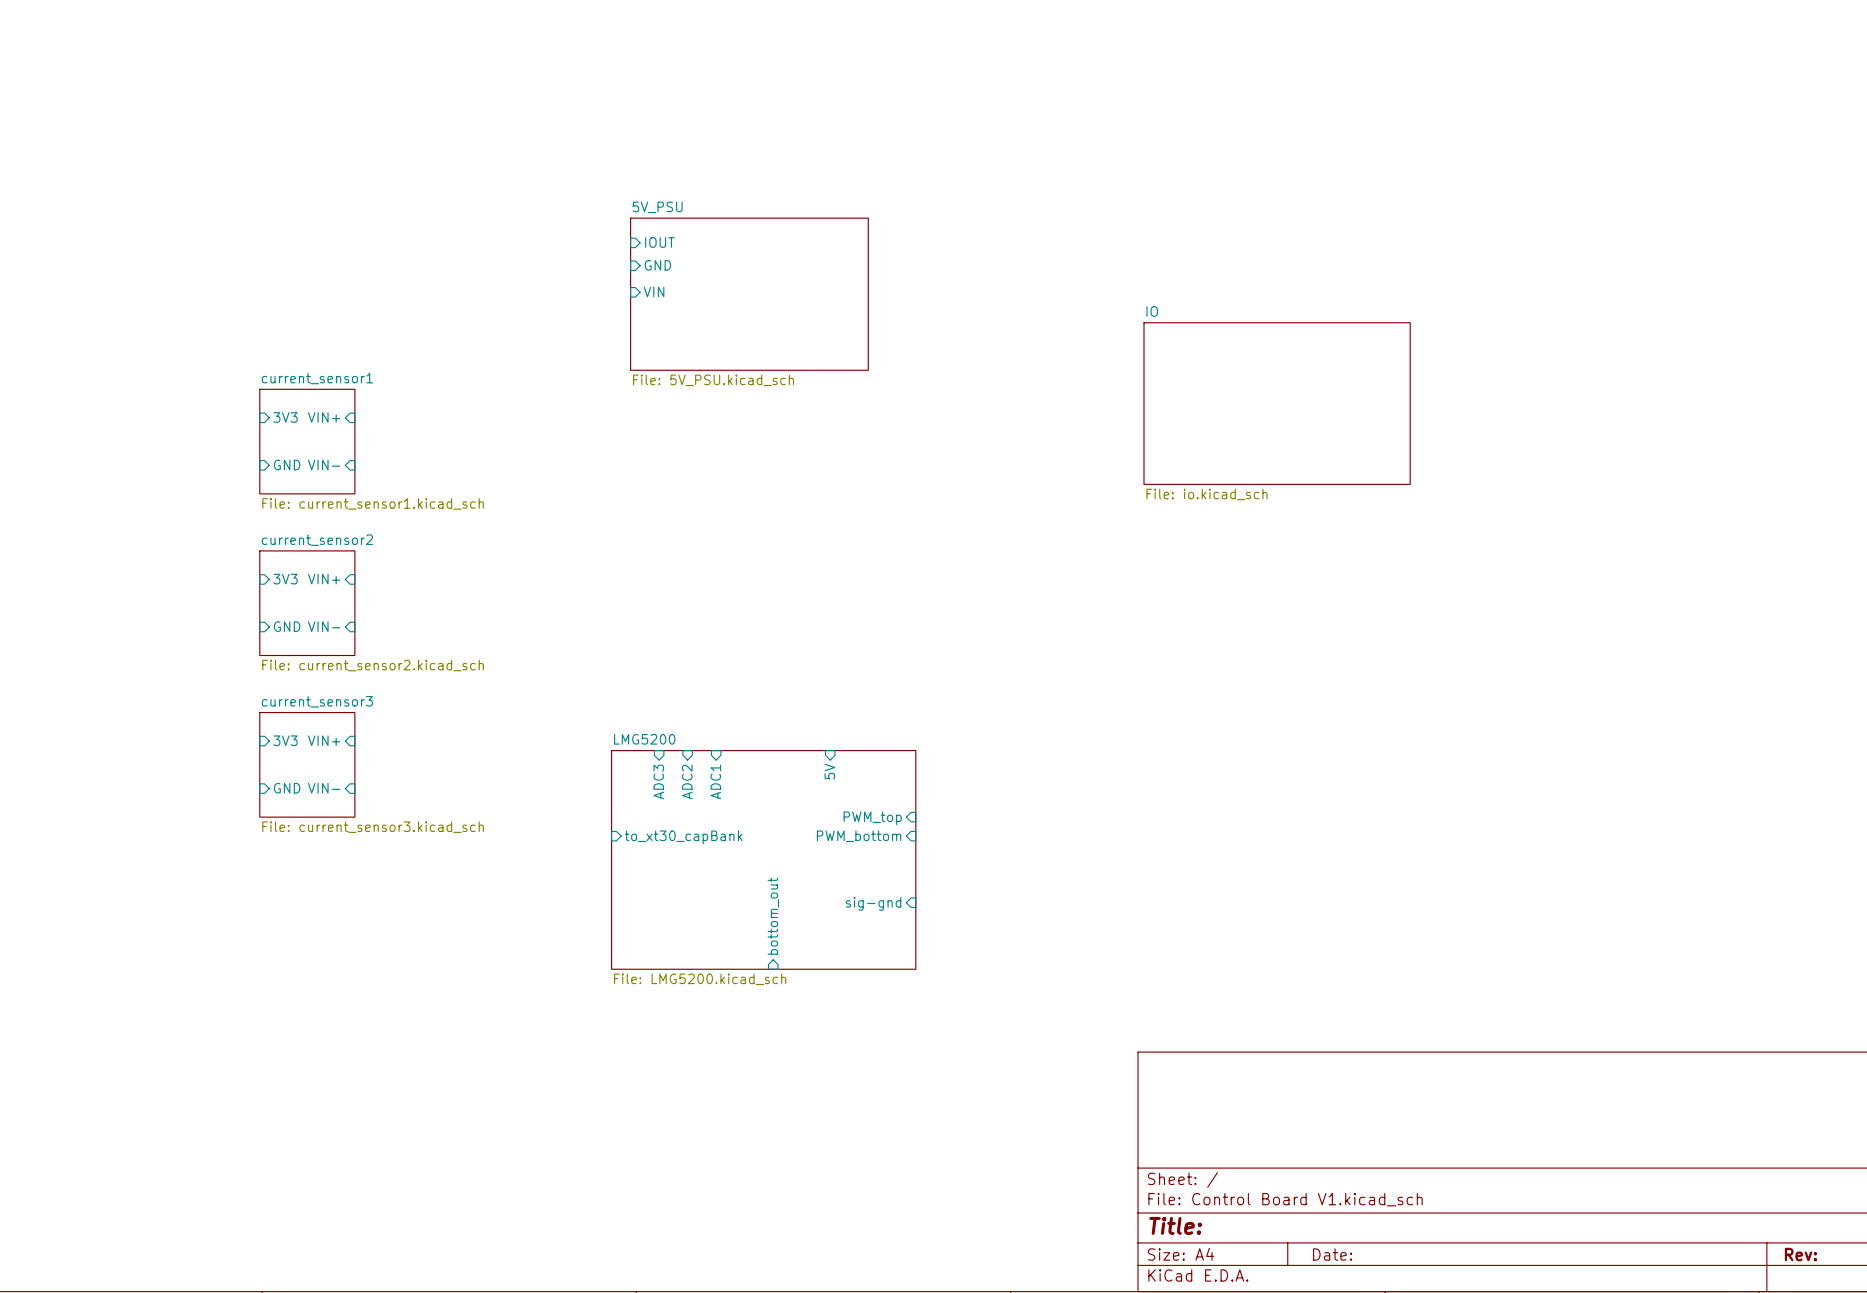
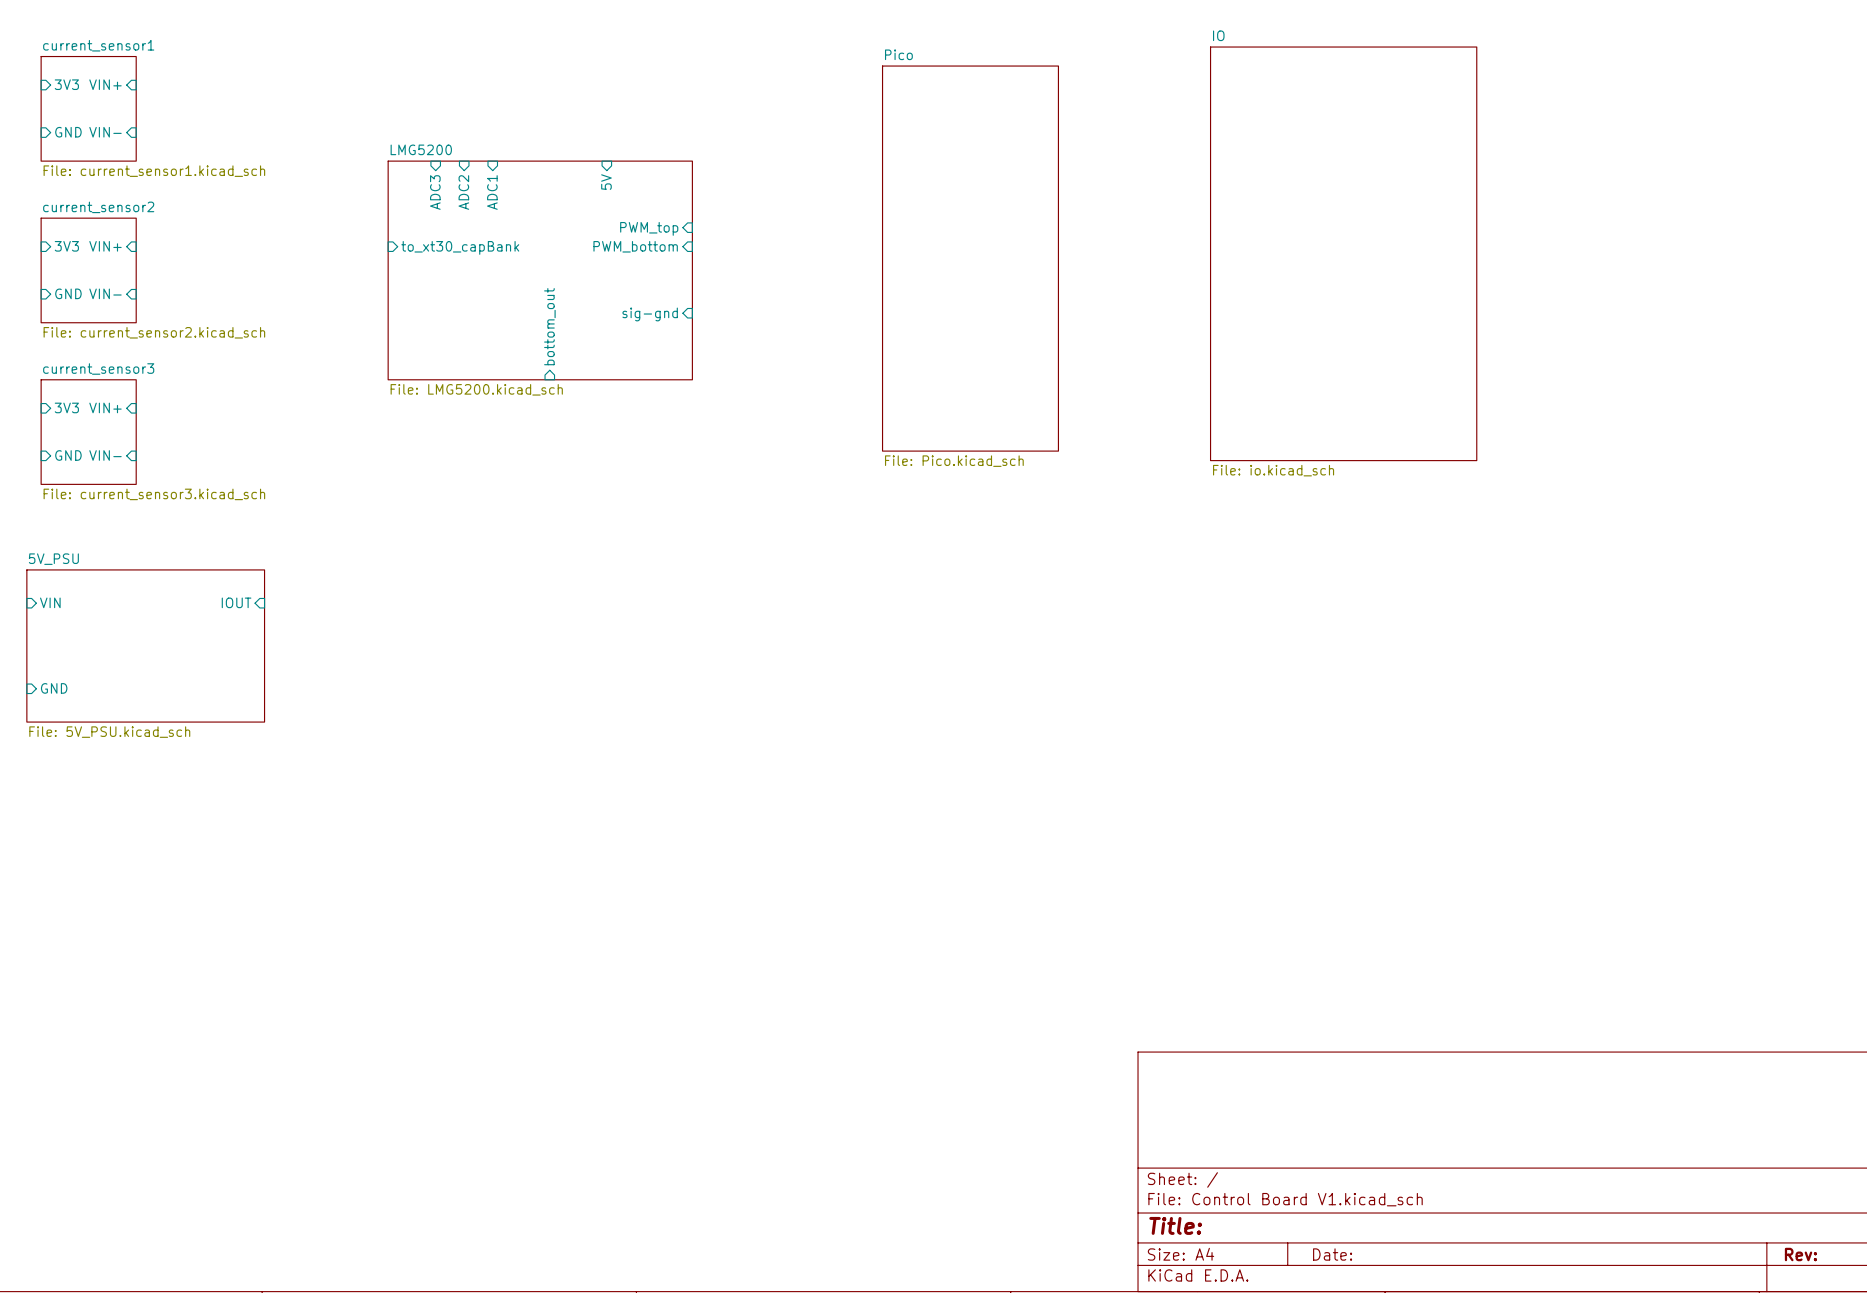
sheet pin: none -> 3V3 (66, 84)
sheet pin: none -> VIN+ (105, 84)
sheet pin: none -> GND (68, 132)
sheet pin: none -> VIN- (105, 132)
sheet pin: none -> 5V (606, 182)
sheet pin: none -> ADC3 (435, 192)
sheet pin: none -> ADC2 (463, 192)
sheet pin: none -> ADC1 (492, 192)
sheet pin: none -> PWM_top (649, 228)
sheet pin: IOUT (659, 242) -> none
sheet pin: none -> 3V3 (66, 246)
sheet pin: none -> VIN+ (105, 246)
sheet pin: none -> PWM_bottom (635, 246)
sheet pin: none -> to_xt30_capBank (460, 247)
sheet IO: none -> File: io.kicad_sch (1343, 253)
sheet Pico: none -> File: Pico.kicad_sch (970, 258)
sheet pin: GND (657, 265) -> none
sheet pin: VIN (654, 291) -> none
sheet pin: none -> GND (68, 293)
sheet pin: none -> VIN- (105, 293)
sheet 5V_PSU position: (749, 294) -> (145, 646)
sheet pin: none -> sig-gnd (650, 314)
sheet pin: none -> bottom_out (549, 326)
sheet IO: File: io.kicad_sch (1277, 403) -> none
sheet pin: none -> 3V3 (66, 407)
sheet pin: none -> VIN+ (105, 407)
sheet pin: 3V3 (285, 417) -> none
sheet pin: VIN+ (324, 417) -> none
sheet current_sensor1 position: (307, 441) -> (88, 108)
sheet pin: none -> GND (68, 455)
sheet pin: none -> VIN- (105, 455)
sheet pin: GND (287, 465) -> none
sheet pin: VIN- (324, 465) -> none
sheet pin: 3V3 (285, 579) -> none
sheet pin: VIN+ (324, 579) -> none
sheet pin: none -> VIN (50, 602)
sheet pin: none -> IOUT (236, 602)
sheet current_sensor2 position: (307, 603) -> (88, 270)
sheet pin: GND (287, 626) -> none
sheet pin: VIN- (324, 626) -> none
sheet pin: none -> GND (54, 688)
sheet pin: 3V3 (285, 740) -> none
sheet pin: VIN+ (324, 740) -> none
sheet current_sensor3 position: (307, 764) -> (88, 432)
sheet pin: 5V (829, 771) -> none
sheet pin: ADC3 (658, 781) -> none
sheet pin: ADC2 (687, 781) -> none
sheet pin: ADC1 (715, 781) -> none
sheet pin: GND (287, 788) -> none
sheet pin: VIN- (324, 788) -> none
sheet pin: PWM_top (872, 818) -> none
sheet pin: PWM_bottom (859, 836) -> none
sheet pin: to_xt30_capBank (683, 837) -> none
sheet LMG5200 position: (763, 859) -> (540, 270)
sheet pin: sig-gnd (873, 903) -> none
sheet pin: bottom_out (773, 916) -> none

